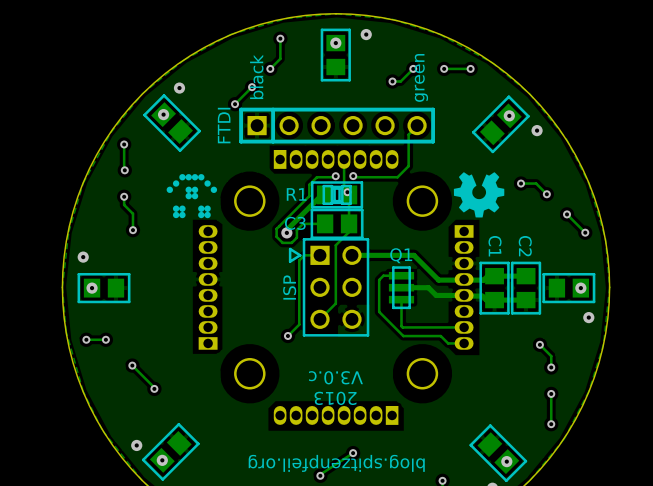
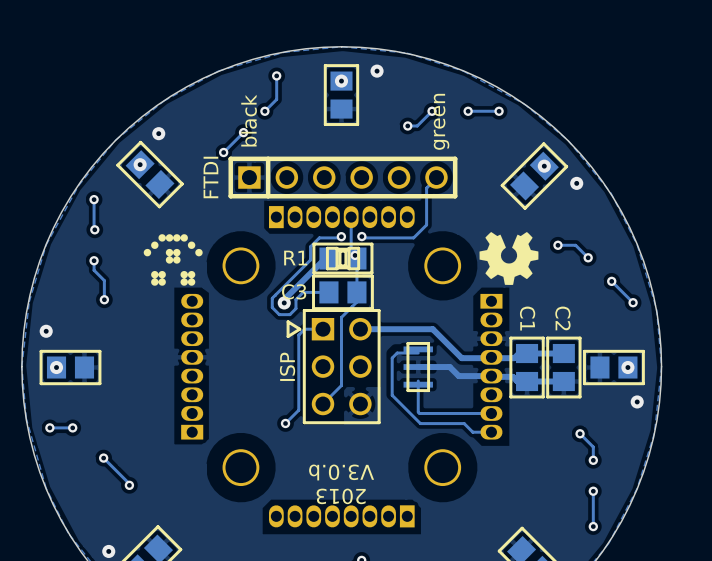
Q1: (401, 287) -> none
part: none -> (418, 367)
text: V3.0.c (335, 377) -> V3.0.b (341, 472)

